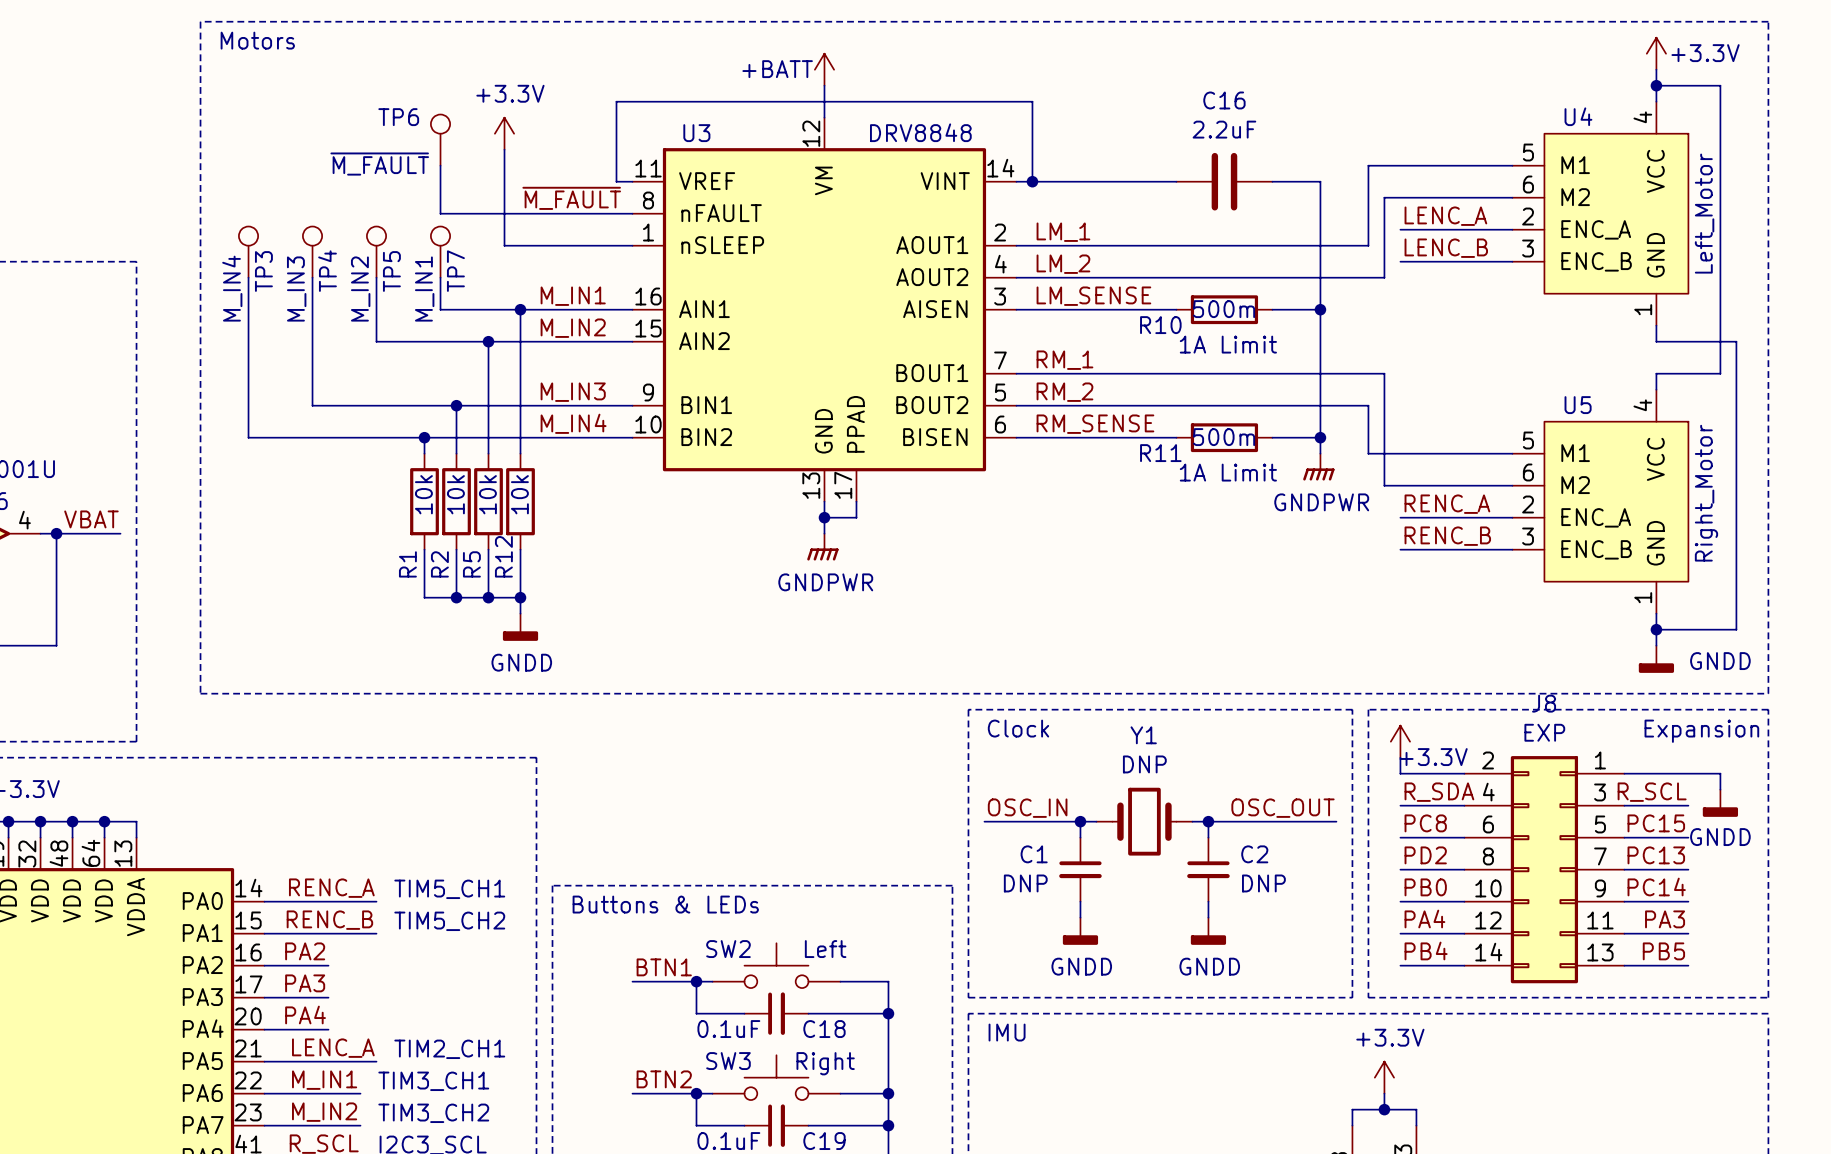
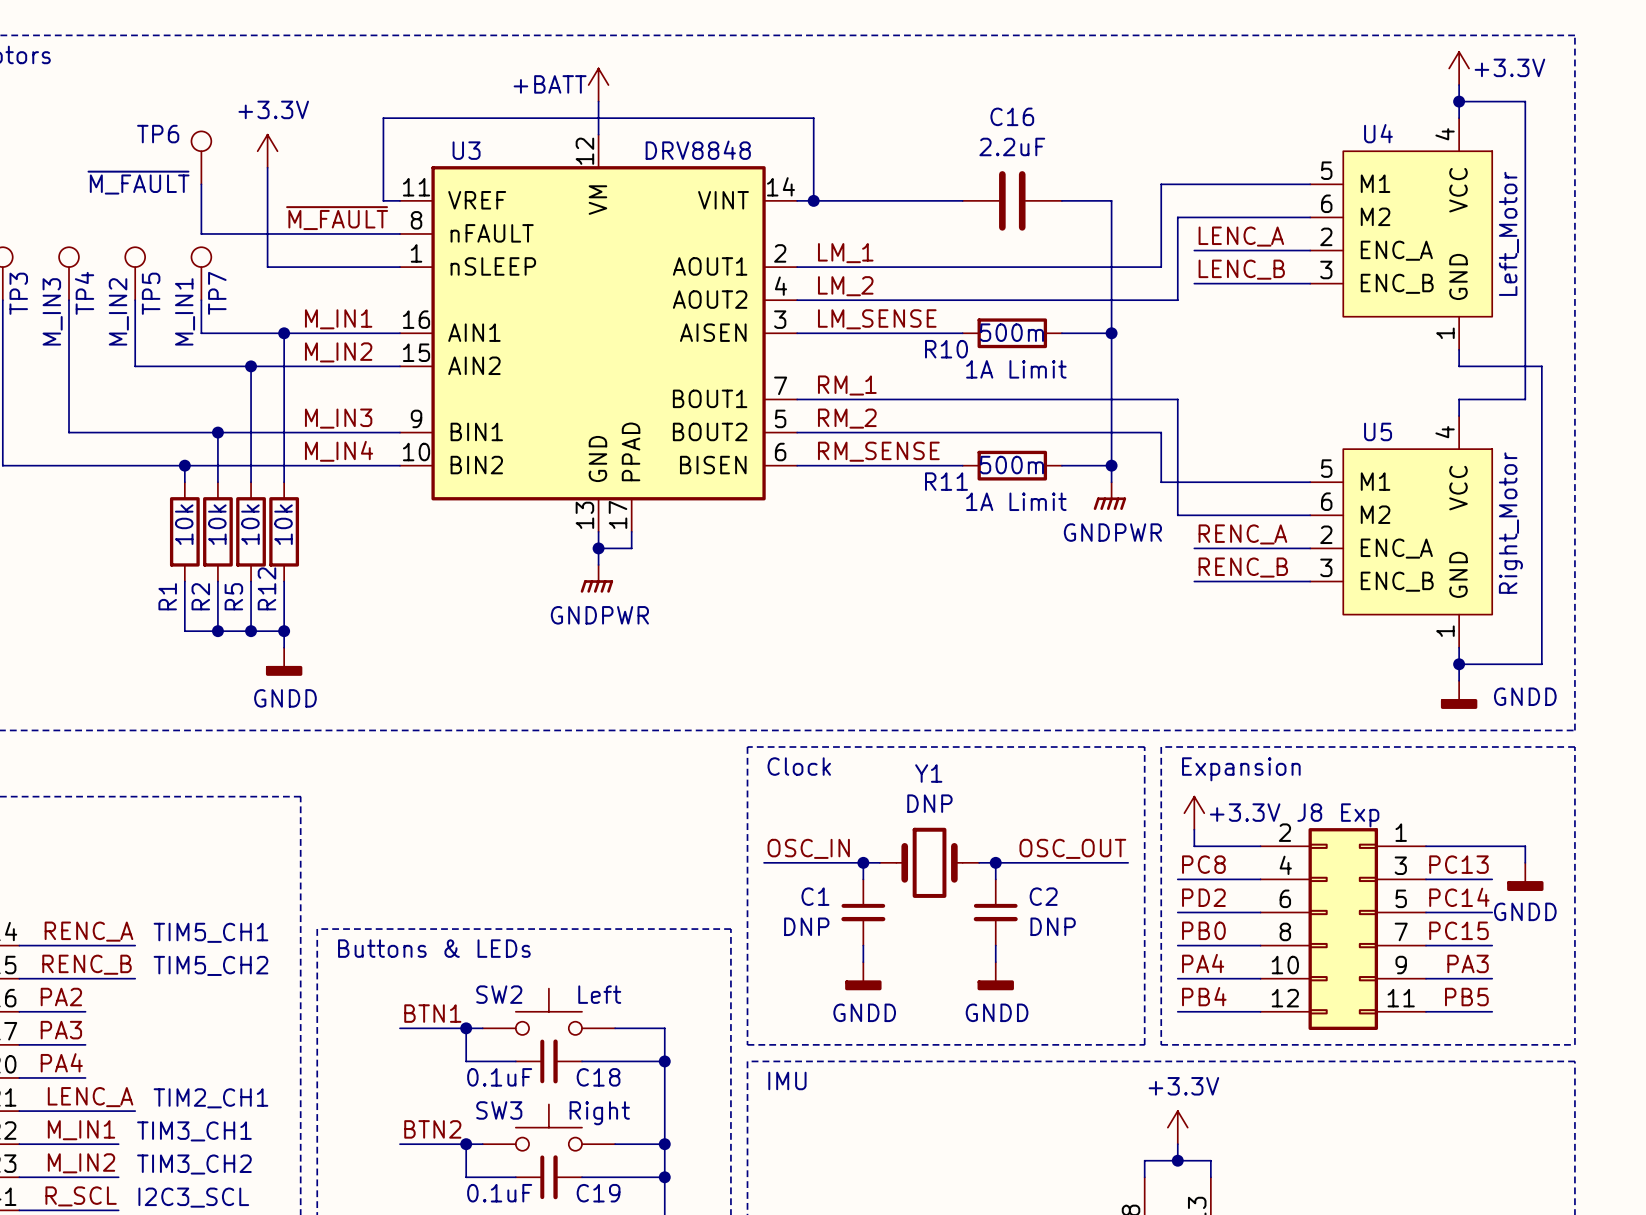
J8 name position: J8 (1544, 703) -> J8 (1309, 812)
text position: Expansion (1701, 731) -> Expansion (1241, 769)
J8 value: EXP (1544, 732) -> Exp (1360, 815)
power symbol position: +3.3V (1400, 741) -> +3.3V (1194, 813)
J8 symbol: [1464, 756, 1625, 984] -> [1260, 828, 1427, 1030]
wire: (1400, 757) (1400, 773) (1464, 773) -> none
power symbol text position: +3.3V (1433, 757) -> +3.3V (1245, 812)
wire: (1624, 773) (1720, 773) (1720, 789) -> none
wire: none -> (1194, 829) (1194, 846)
label: R_SDA (1439, 792) -> none
label: R_SCL (1652, 792) -> none
power symbol position: GNDD (1720, 803) -> GNDD (1525, 876)
wire: none -> (1492, 846) (1525, 846) (1525, 862)
label position: PC8 (1425, 823) -> PC8 (1203, 864)
label: PC15 (1656, 823) -> PC13 (1458, 864)
wire: none -> (1177, 879) (1194, 879)
label position: PD2 (1425, 855) -> PD2 (1203, 897)
label: PC13 (1656, 855) -> PC14 (1459, 897)
wire: none -> (1177, 912) (1194, 912)
label position: PB0 (1425, 887) -> PB0 (1203, 930)
label: PC14 (1656, 887) -> PC15 (1458, 930)
wire: none -> (1177, 945) (1194, 945)
label position: PA4 (1424, 919) -> PA4 (1203, 963)
wire: none -> (1177, 978) (1194, 978)
label position: PB4 (1426, 951) -> PB4 (1204, 996)
wire: none -> (1177, 1011) (1194, 1011)

